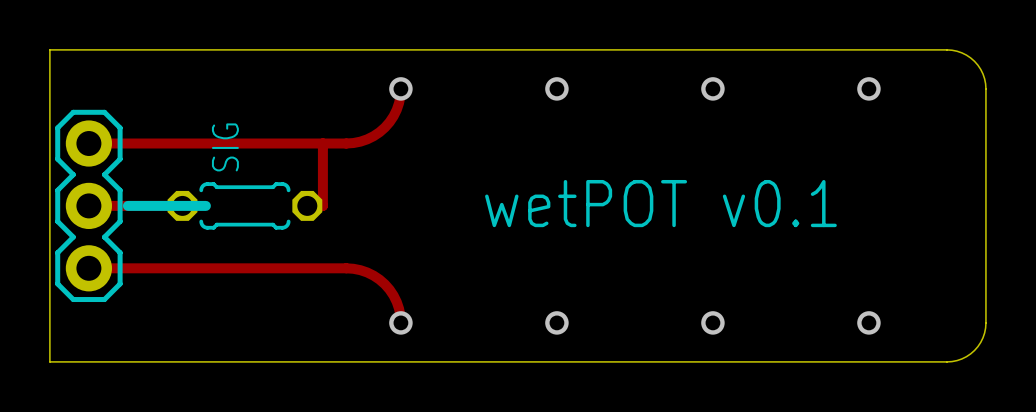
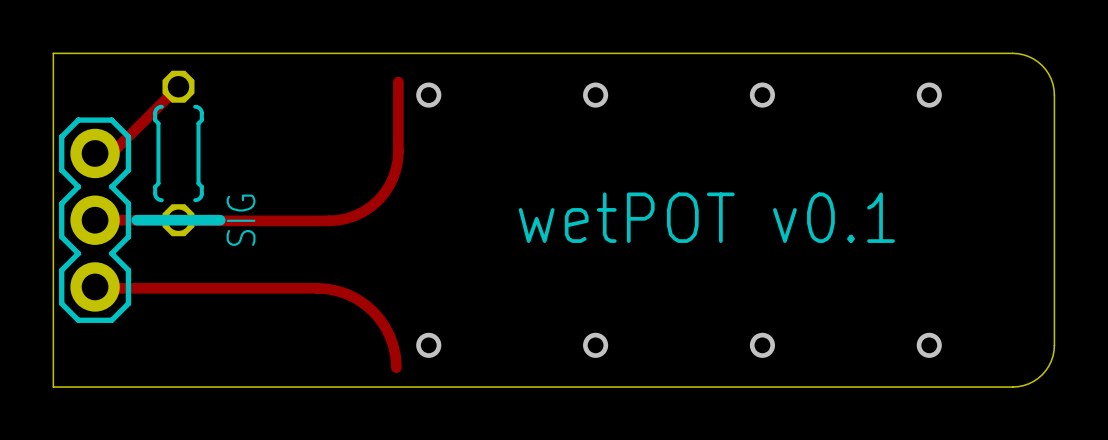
track: none -> (398, 82) (398, 151) (396, 169) (384, 193) (363, 211) (346, 218) (328, 220) (180, 220)
track: (400, 88) (396, 109) (389, 122) (373, 136) (353, 143) (104, 143) -> (178, 86) (111, 153)
track: (322, 143) (322, 205) (307, 205) -> none
text position: SIG (225, 147) -> SIG (241, 220)
part rotation: 0° (244, 205) -> 90° clockwise (178, 153)
part position: (244, 205) -> (178, 153)
track: (88, 268) (353, 268) (373, 275) (389, 289) (396, 302) (400, 322) -> none
track: none -> (98, 288) (316, 288) (337, 290) (365, 304) (379, 319) (390, 337) (396, 367)

